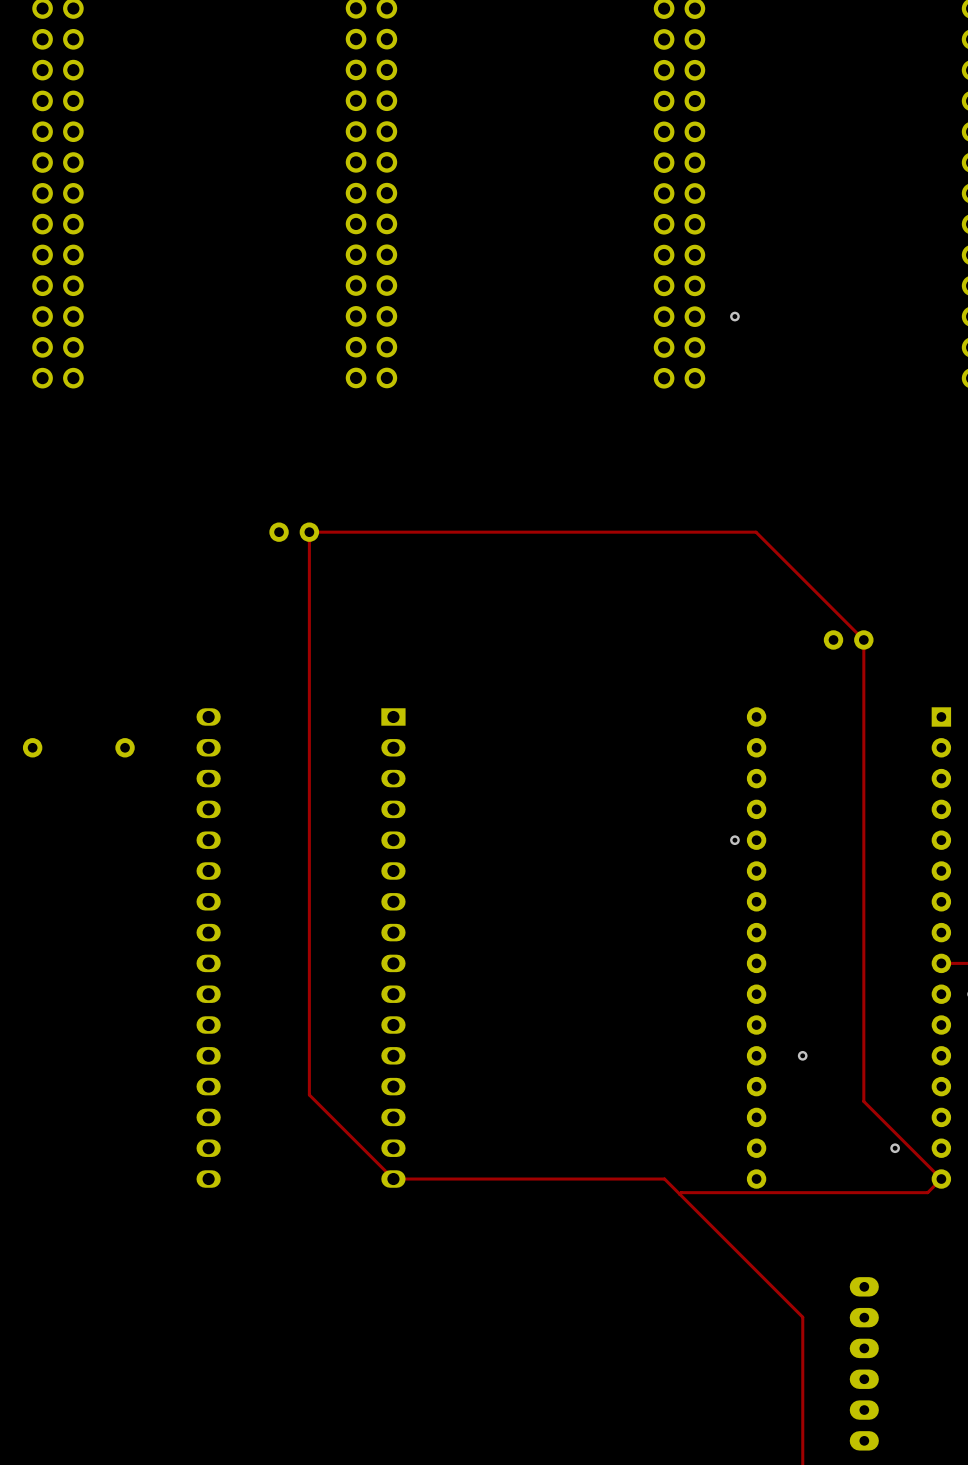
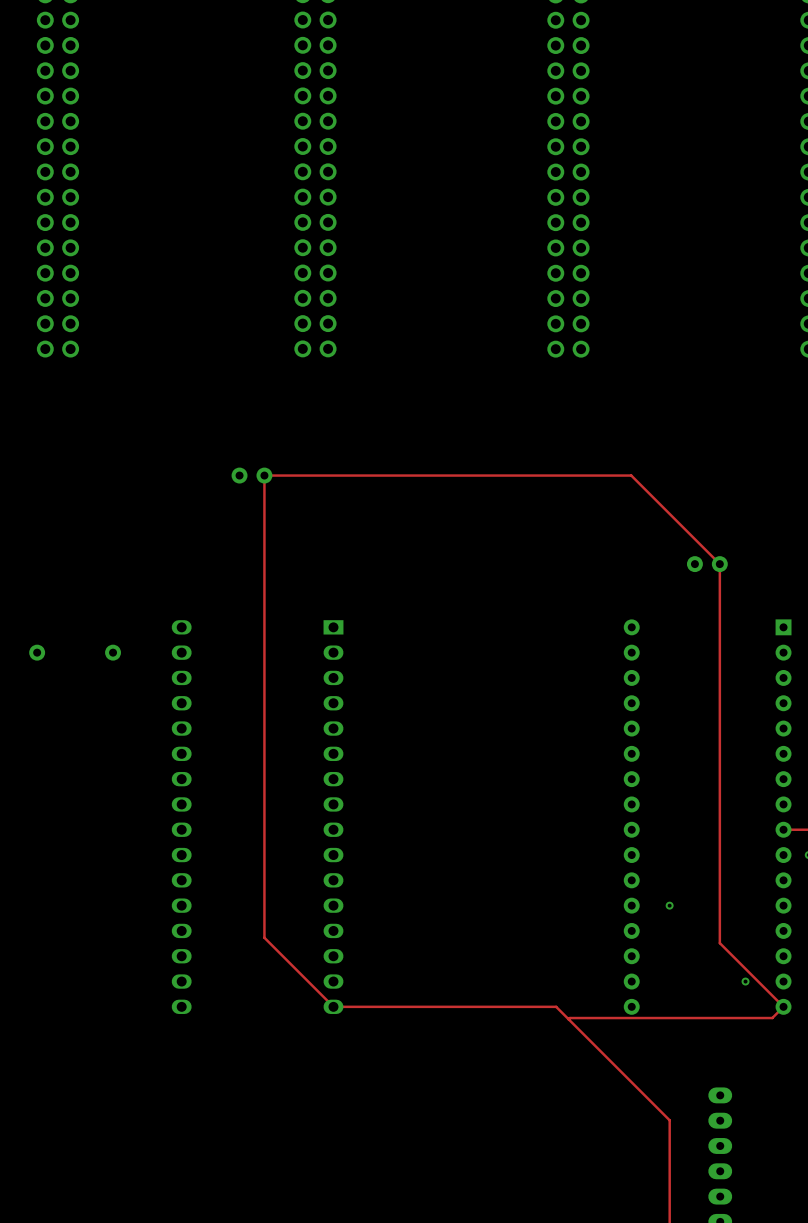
via: (734, 316) -> none
via: (734, 840) -> none

